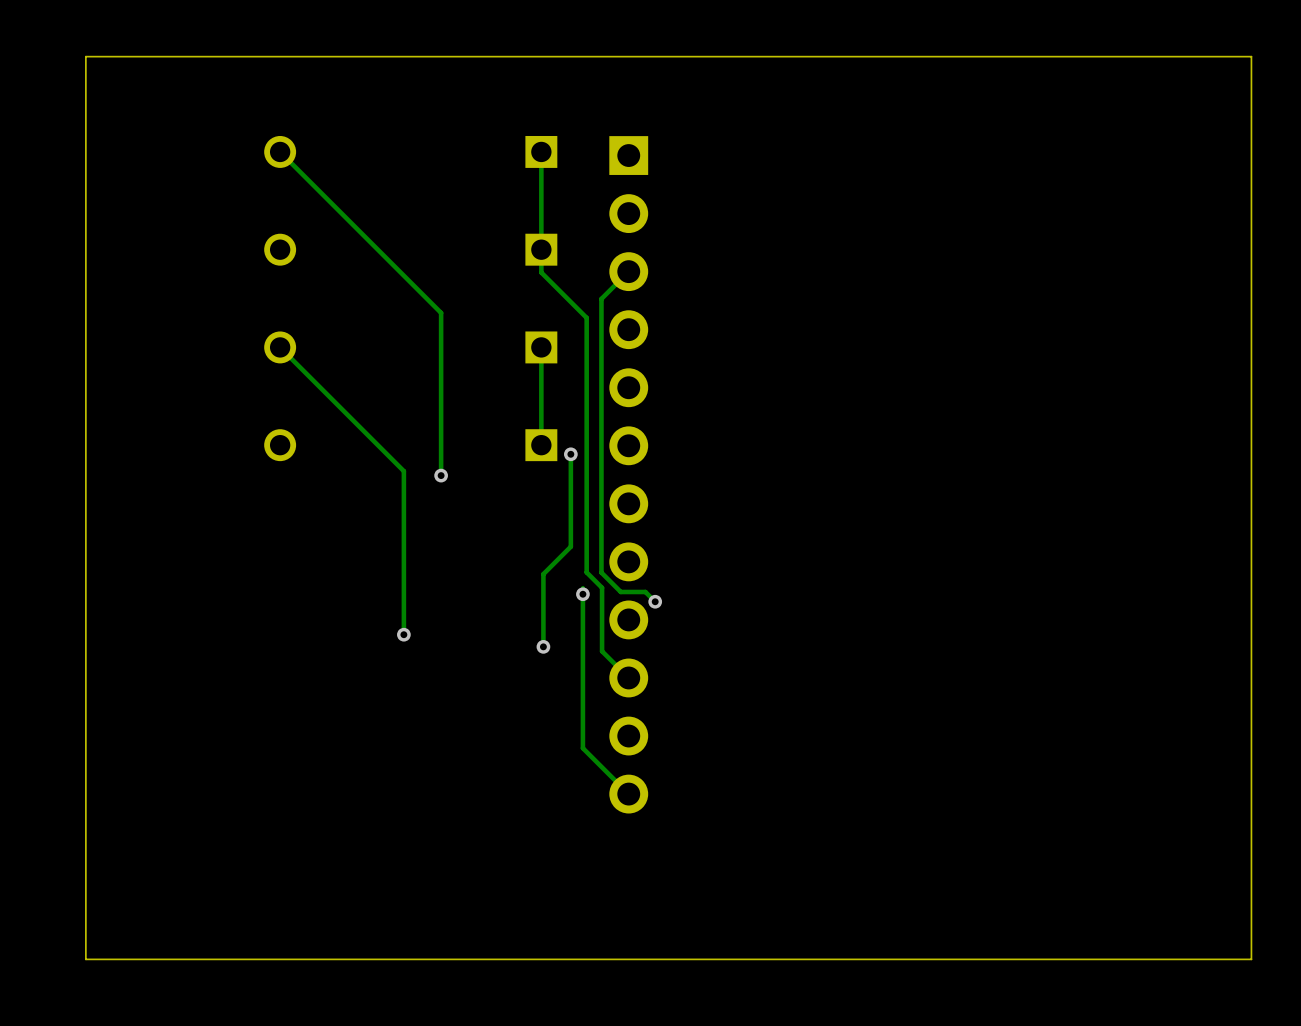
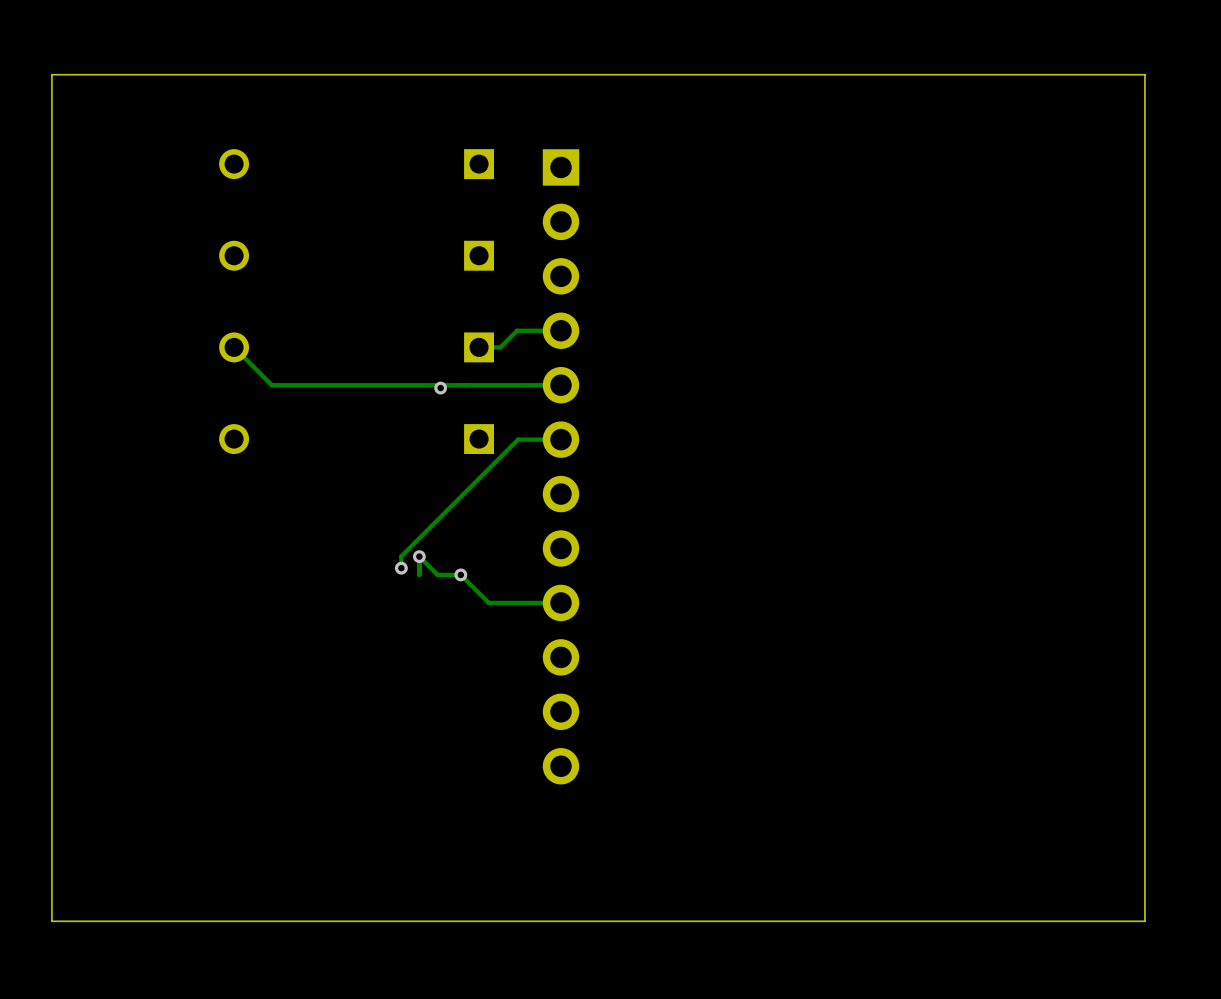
track: (280, 151) (441, 312) (441, 475) -> none
track: (541, 151) (541, 272) (586, 317) (586, 572) (602, 587) (602, 651) (628, 677) -> none
track: (628, 271) (601, 298) (601, 572) (620, 591) (645, 591) (655, 601) -> none
track: (541, 347) (541, 445) -> (479, 347) (500, 347) (517, 330) (561, 330)
track: (320, 387) (403, 471) (403, 634) -> (271, 385) (561, 385)
via: none -> (440, 388)
track: none -> (561, 439) (518, 439) (401, 556) (401, 568)
track: (570, 454) (570, 546) (543, 574) (543, 646) -> none
via: (570, 454) -> none
via: (441, 475) -> none
via: none -> (419, 556)
via: none -> (401, 568)
track: (582, 588) (582, 748) (628, 794) -> none
track: none -> (419, 574) (419, 556) (437, 574) (460, 574) (488, 602) (561, 602)
via: none -> (460, 574)
via: (582, 594) -> none
via: (655, 601) -> none
via: (403, 634) -> none
via: (543, 646) -> none

